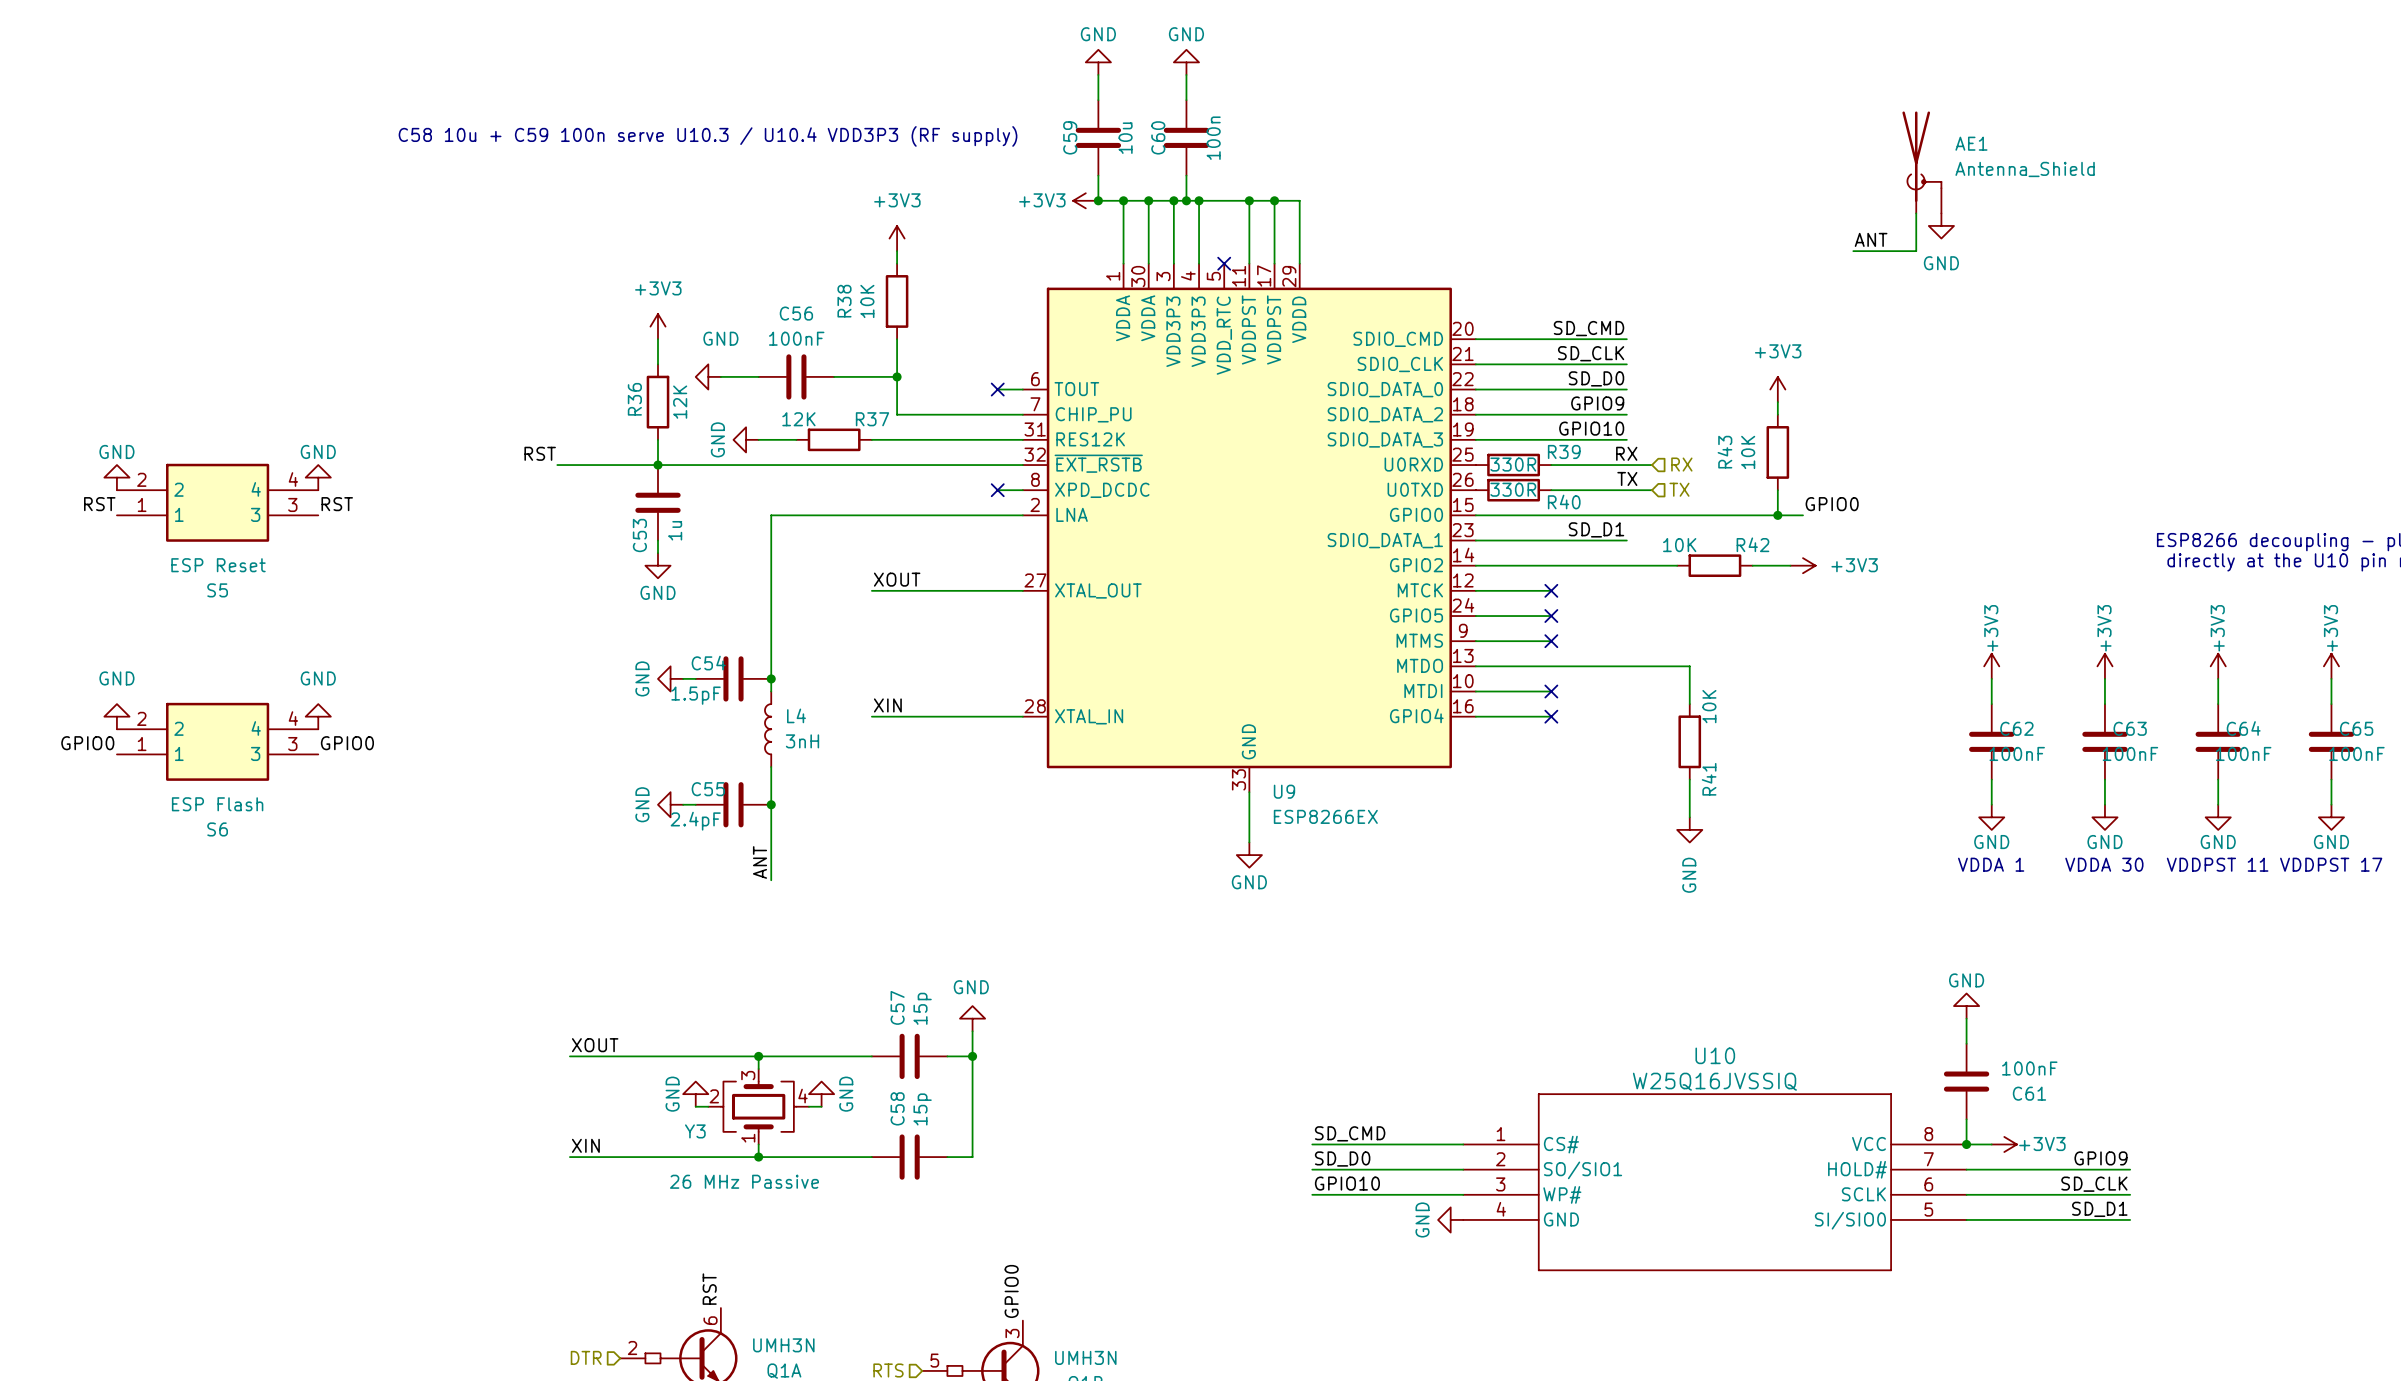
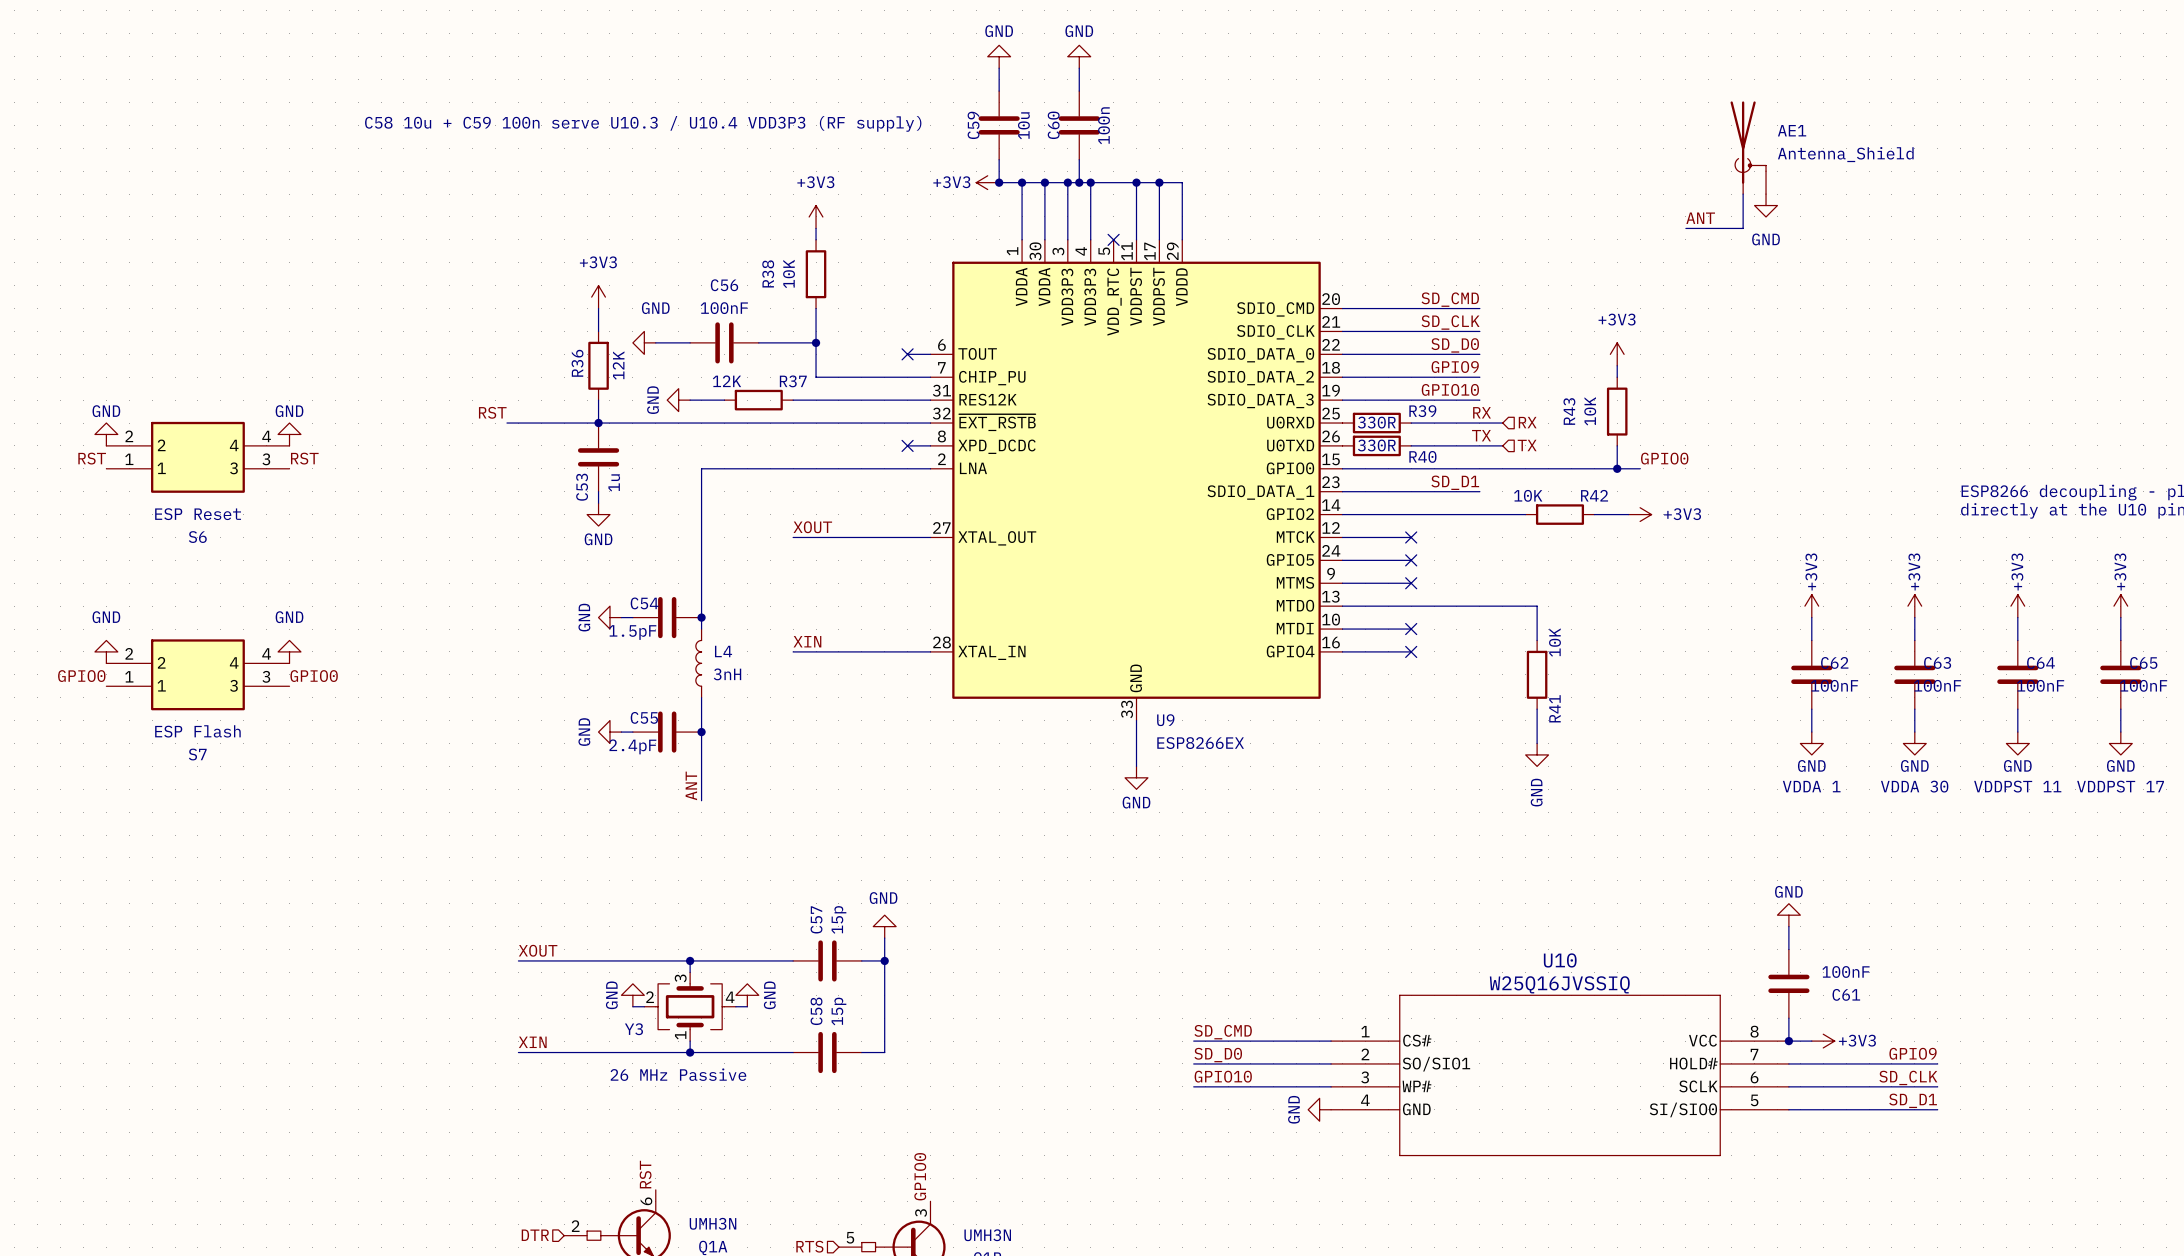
S5 name: S5 (217, 590) -> S6 (197, 537)
S6 name: S6 (217, 829) -> S7 (197, 754)

